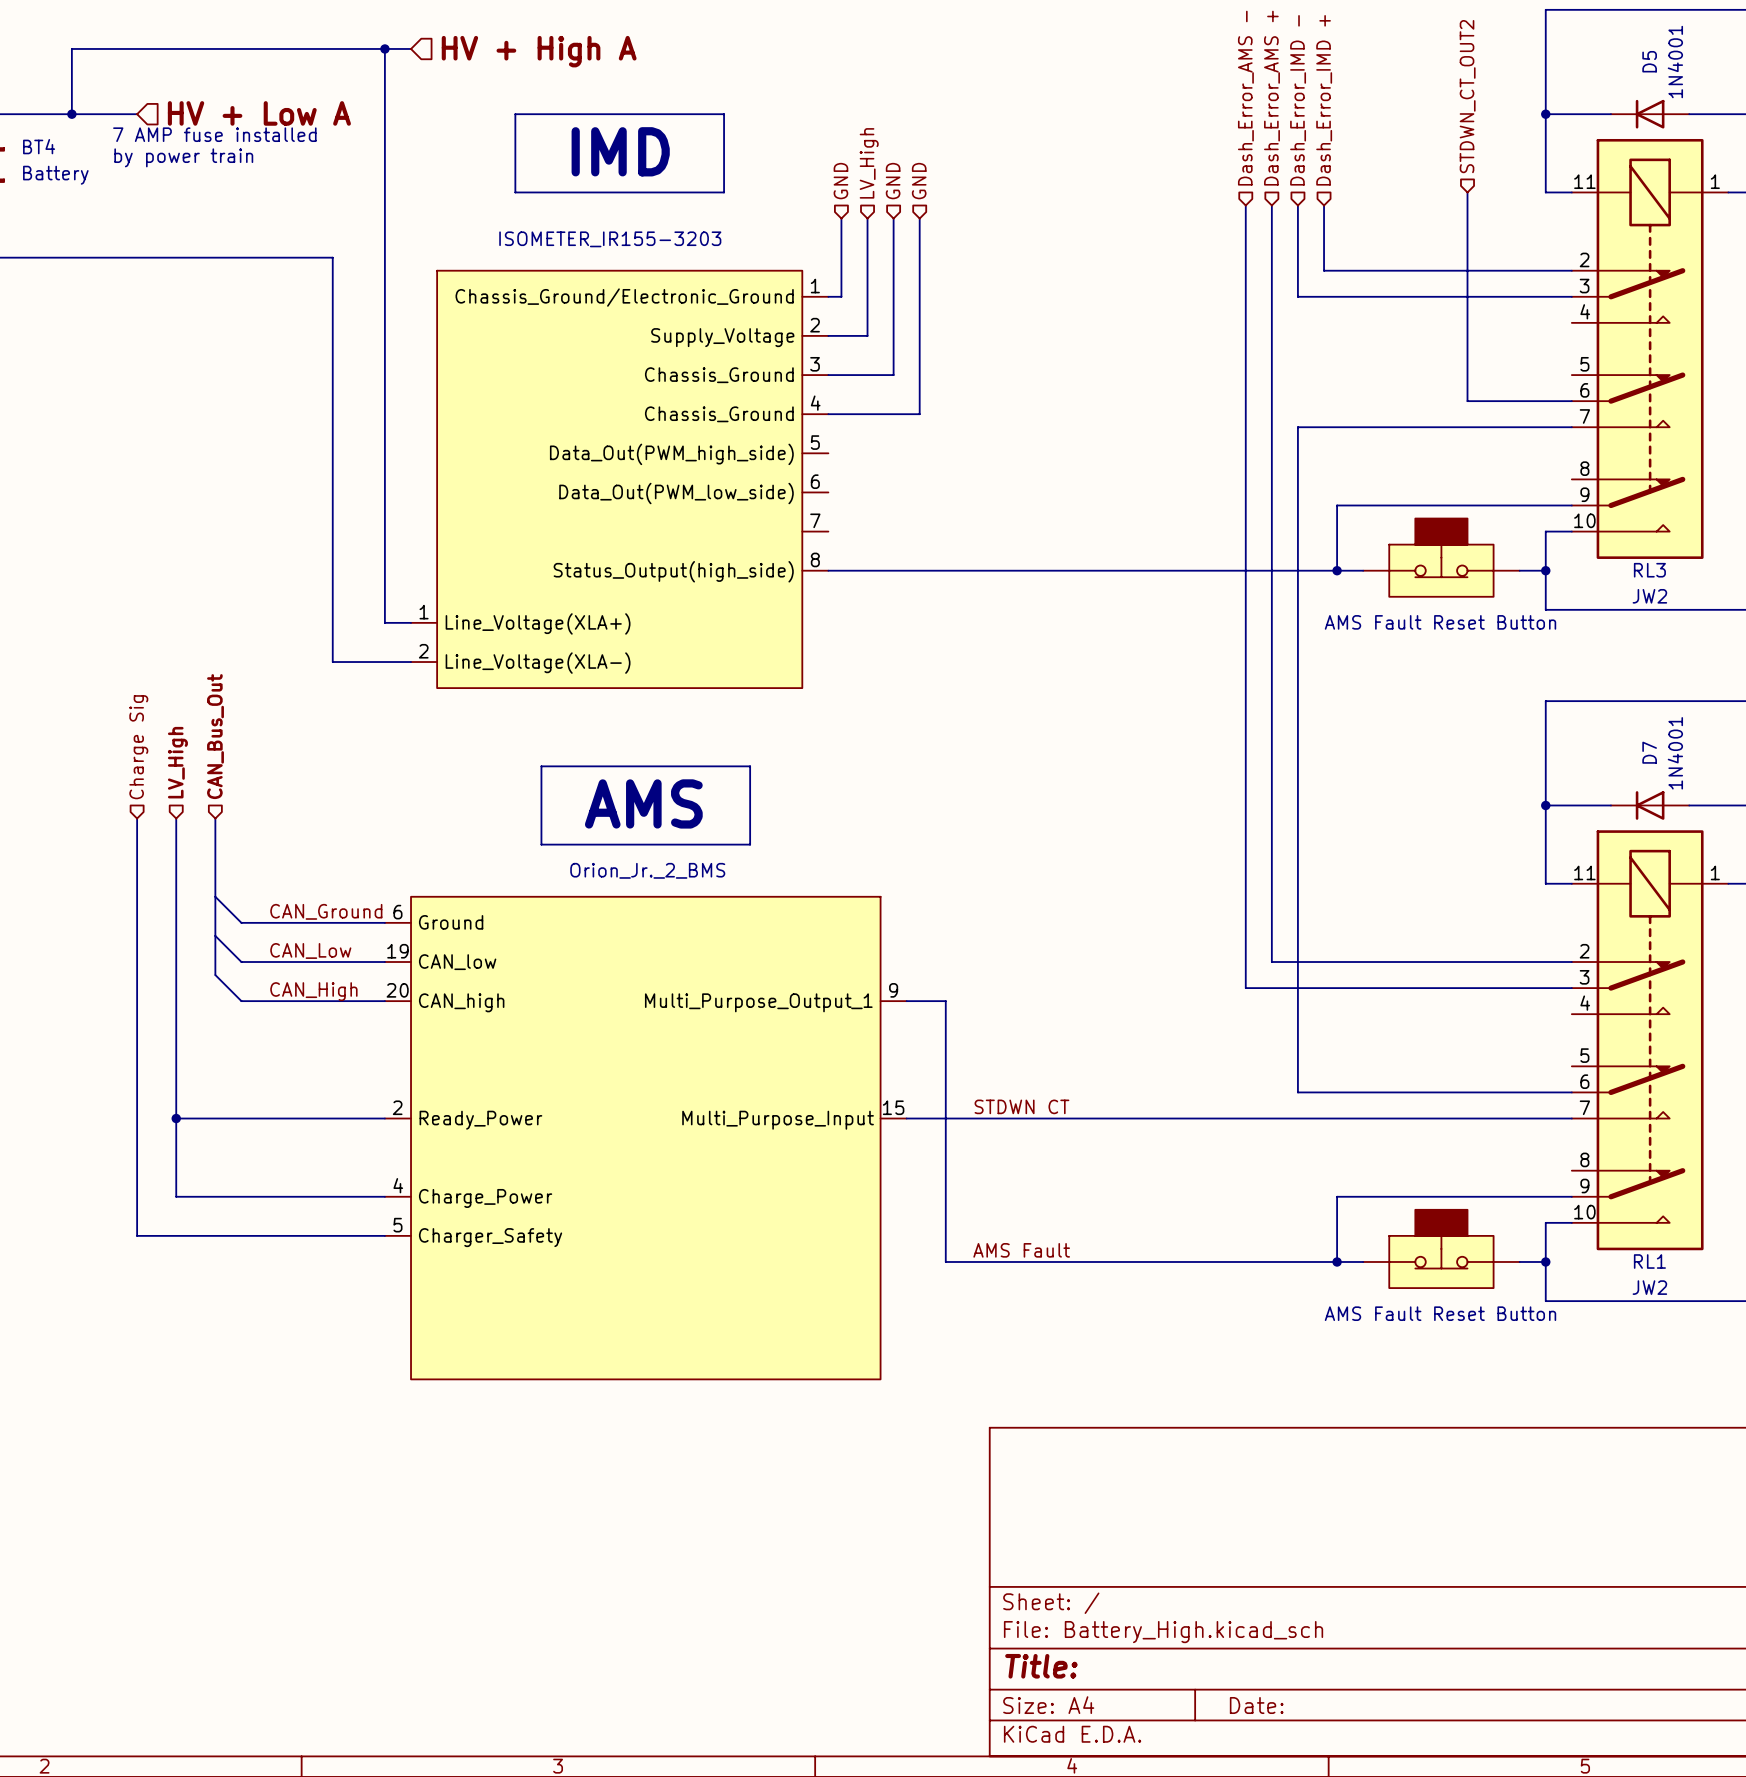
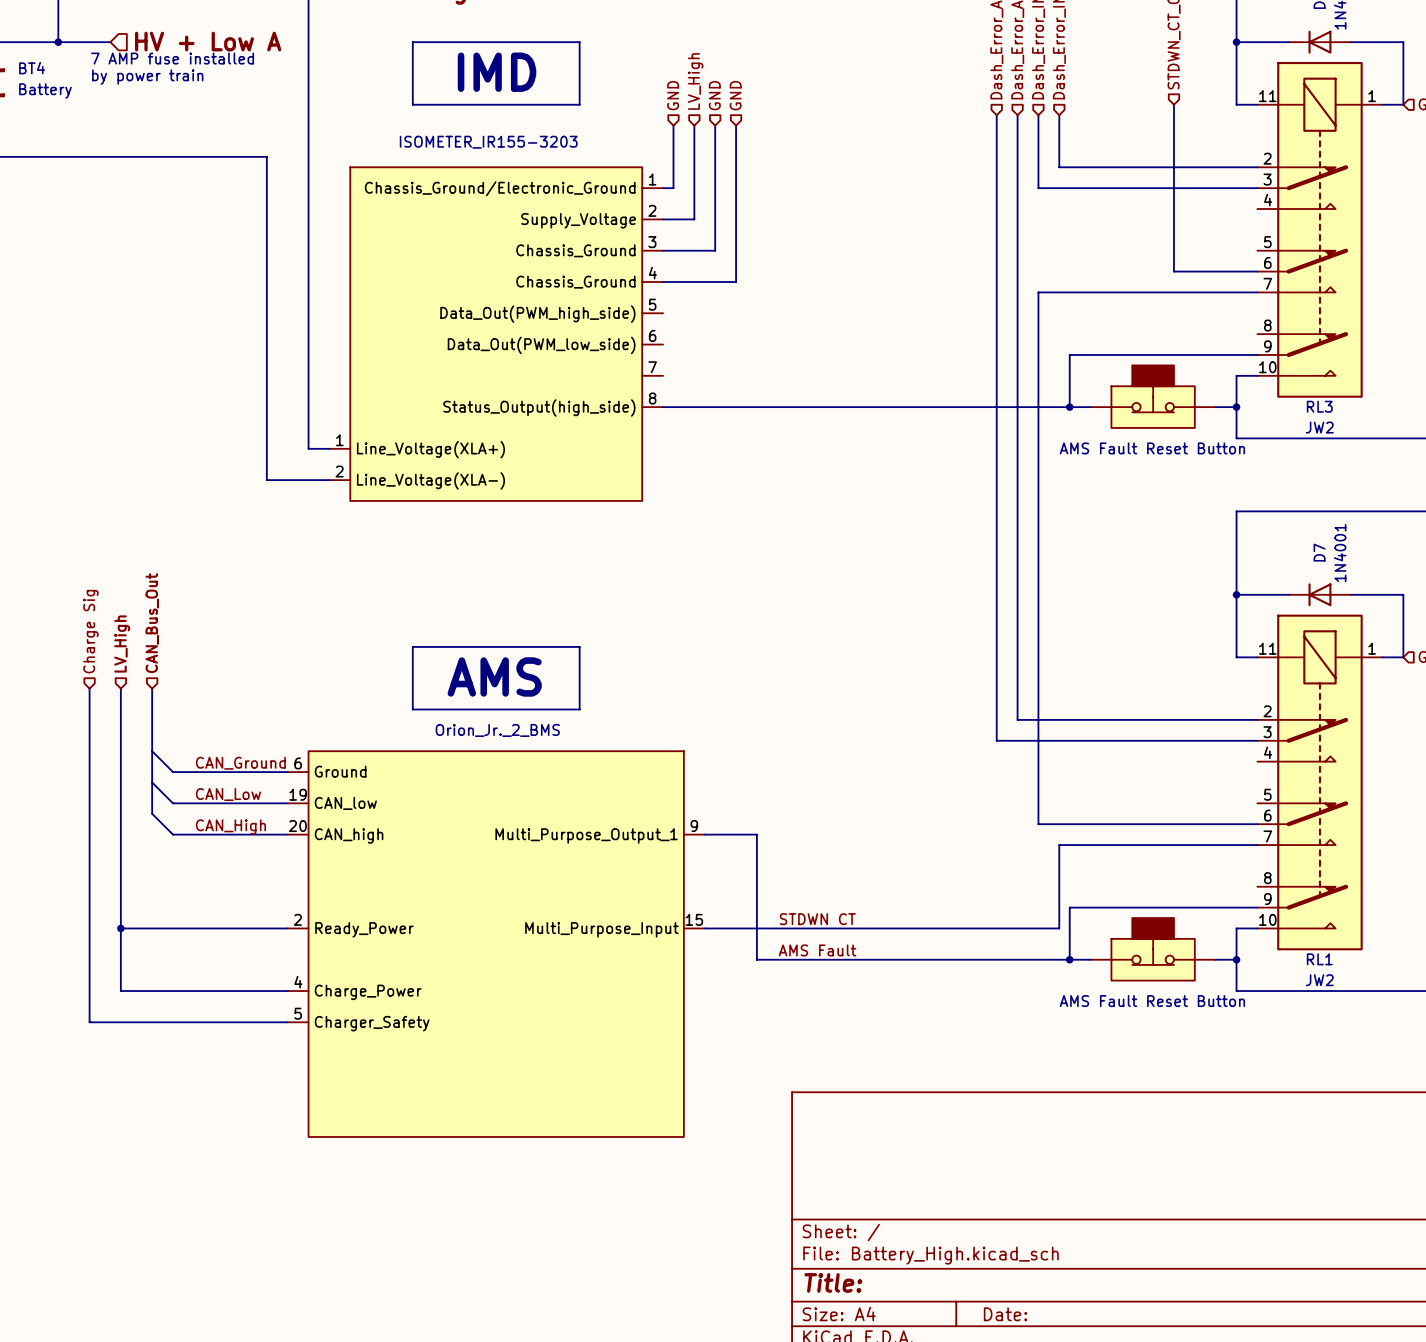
hierarchical label position: CAN_Bus_Out (215, 736) -> CAN_Bus_Out (152, 623)
hierarchical label position: Charge Sig (138, 747) -> Charge Sig (90, 631)
hierarchical label position: LV_High (177, 762) -> LV_High (122, 643)
line: (541, 766) (750, 766) (750, 844) (541, 844) (541, 766) -> (412, 646) (579, 646) (579, 709) (412, 709) (412, 646)
text position: AMS (643, 803) -> AMS (494, 676)
wire: (137, 818) (137, 1235) (384, 1235) -> (89, 688) (89, 1022) (287, 1022)
wire: (176, 818) (176, 1196) (384, 1196) -> (120, 688) (120, 991) (287, 991)
bus: (215, 818) (215, 975) -> (152, 688) (152, 813)
wire: (215, 896) (241, 922) (384, 922) -> (152, 751) (173, 772) (287, 772)
label position: CAN_Ground (326, 911) -> CAN_Ground (240, 763)
wire: (215, 935) (241, 962) (384, 962) -> (152, 782) (173, 803) (287, 803)
label position: CAN_Low (310, 950) -> CAN_Low (228, 794)
wire: (215, 975) (241, 1001) (384, 1001) -> (152, 813) (173, 834) (287, 834)
label position: CAN_High (313, 991) -> CAN_High (230, 827)
wire: (906, 1001) (945, 1001) (945, 1105) -> (704, 834) (756, 834)
label position: STDWN CT (1021, 1106) -> STDWN CT (817, 919)
wire: (176, 1118) (384, 1118) -> (120, 928) (287, 928)
junction: (176, 1118) -> none
wire: (906, 1118) (1324, 1118) -> (704, 928) (1059, 928) (1059, 845)
part position: (645, 1138) -> (496, 944)
junction: none -> (120, 928)

